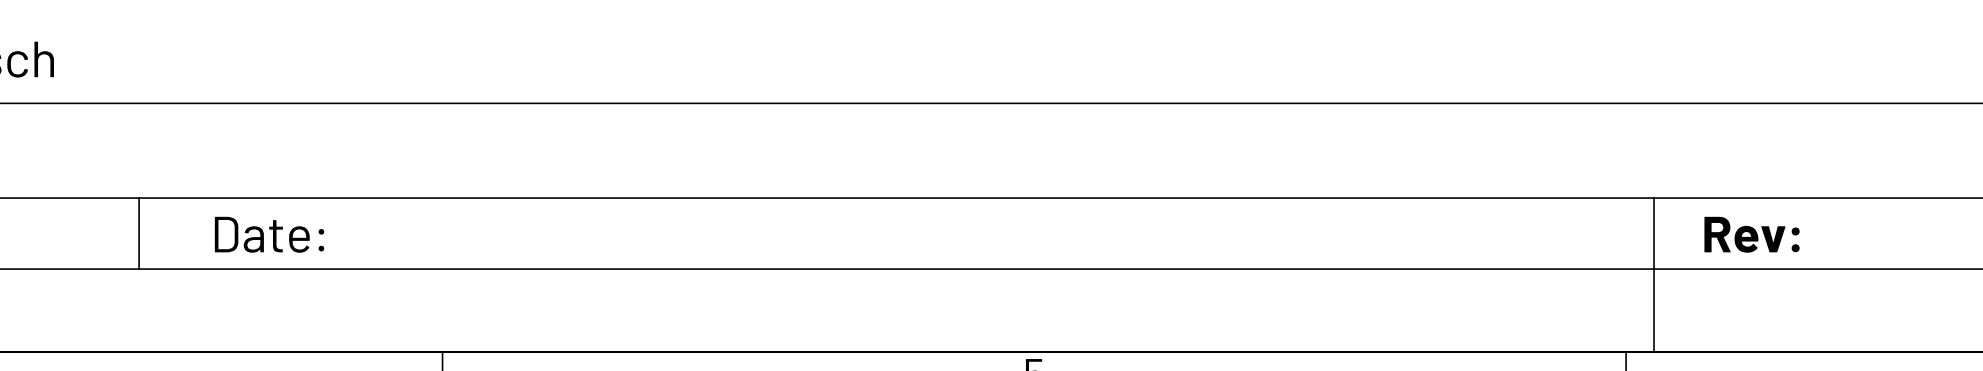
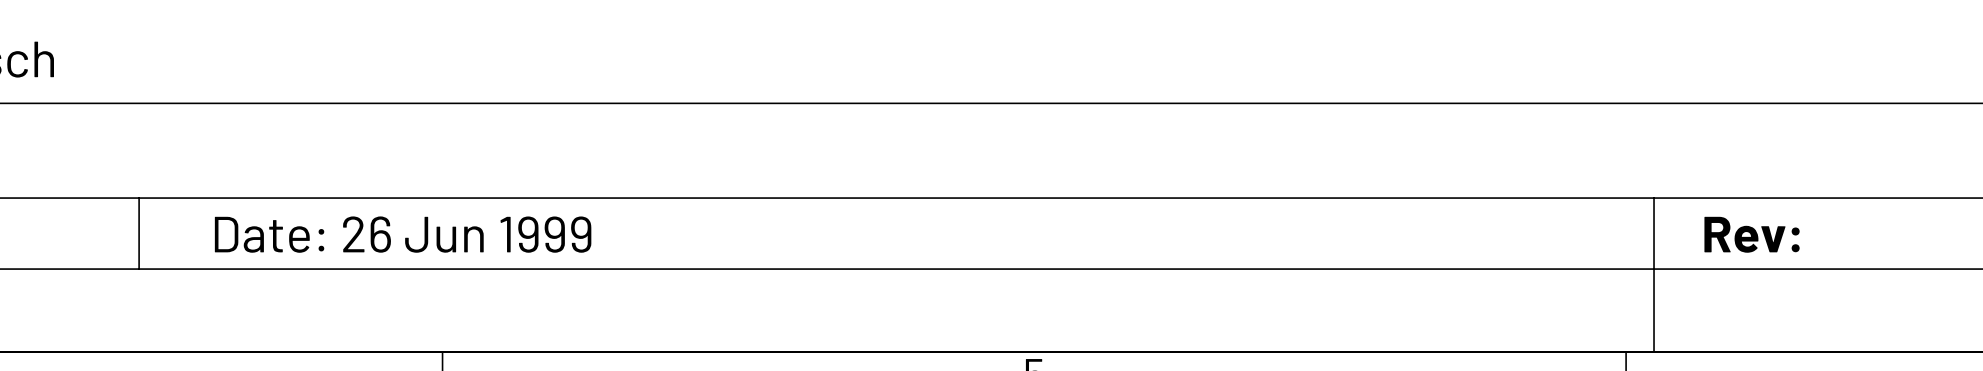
title block: Date: (269, 234) -> Date: 26 Jun 1999 (403, 234)

